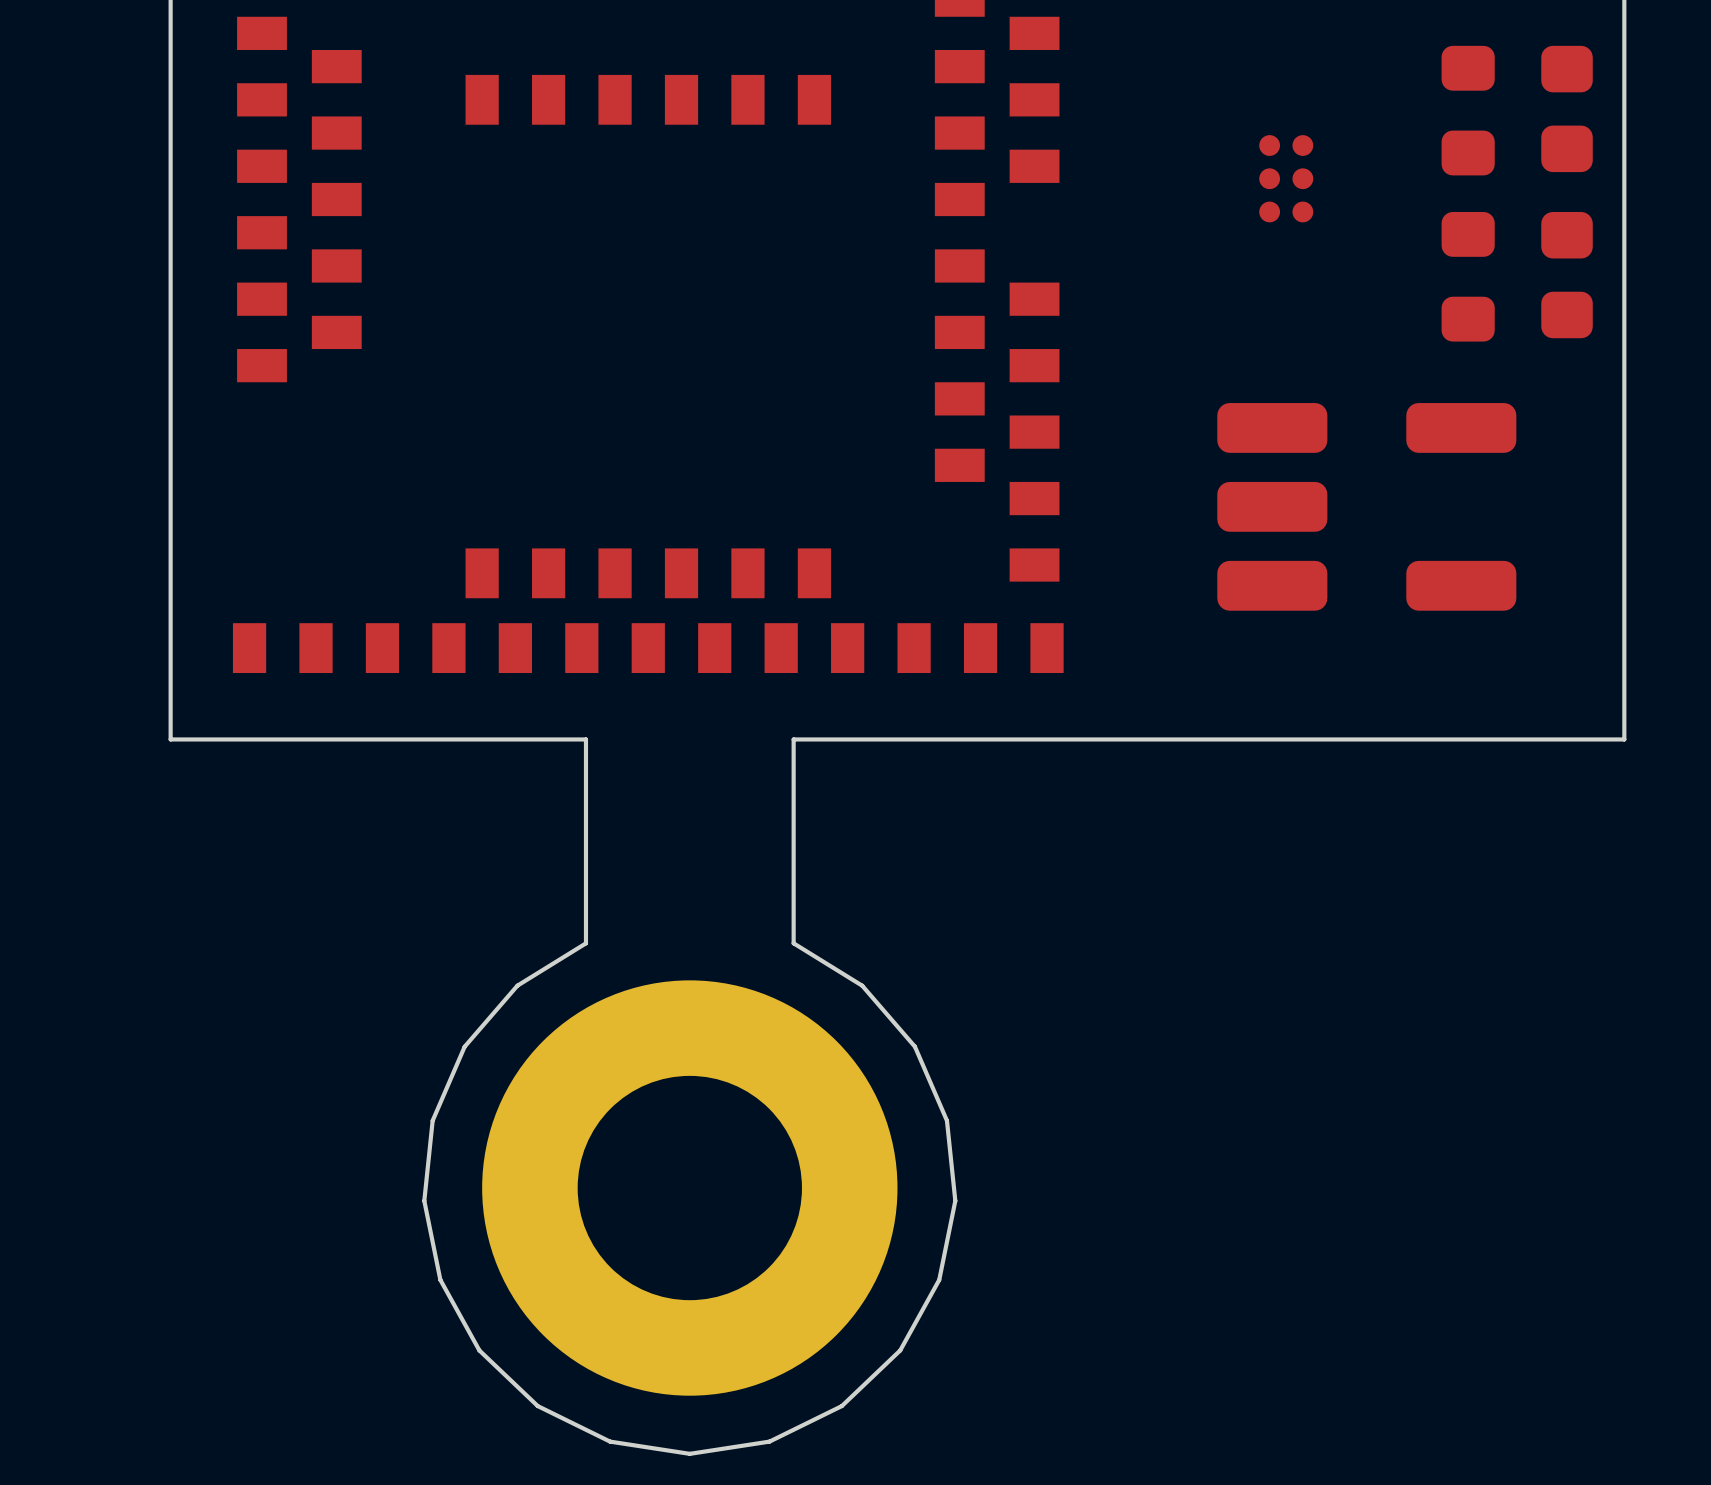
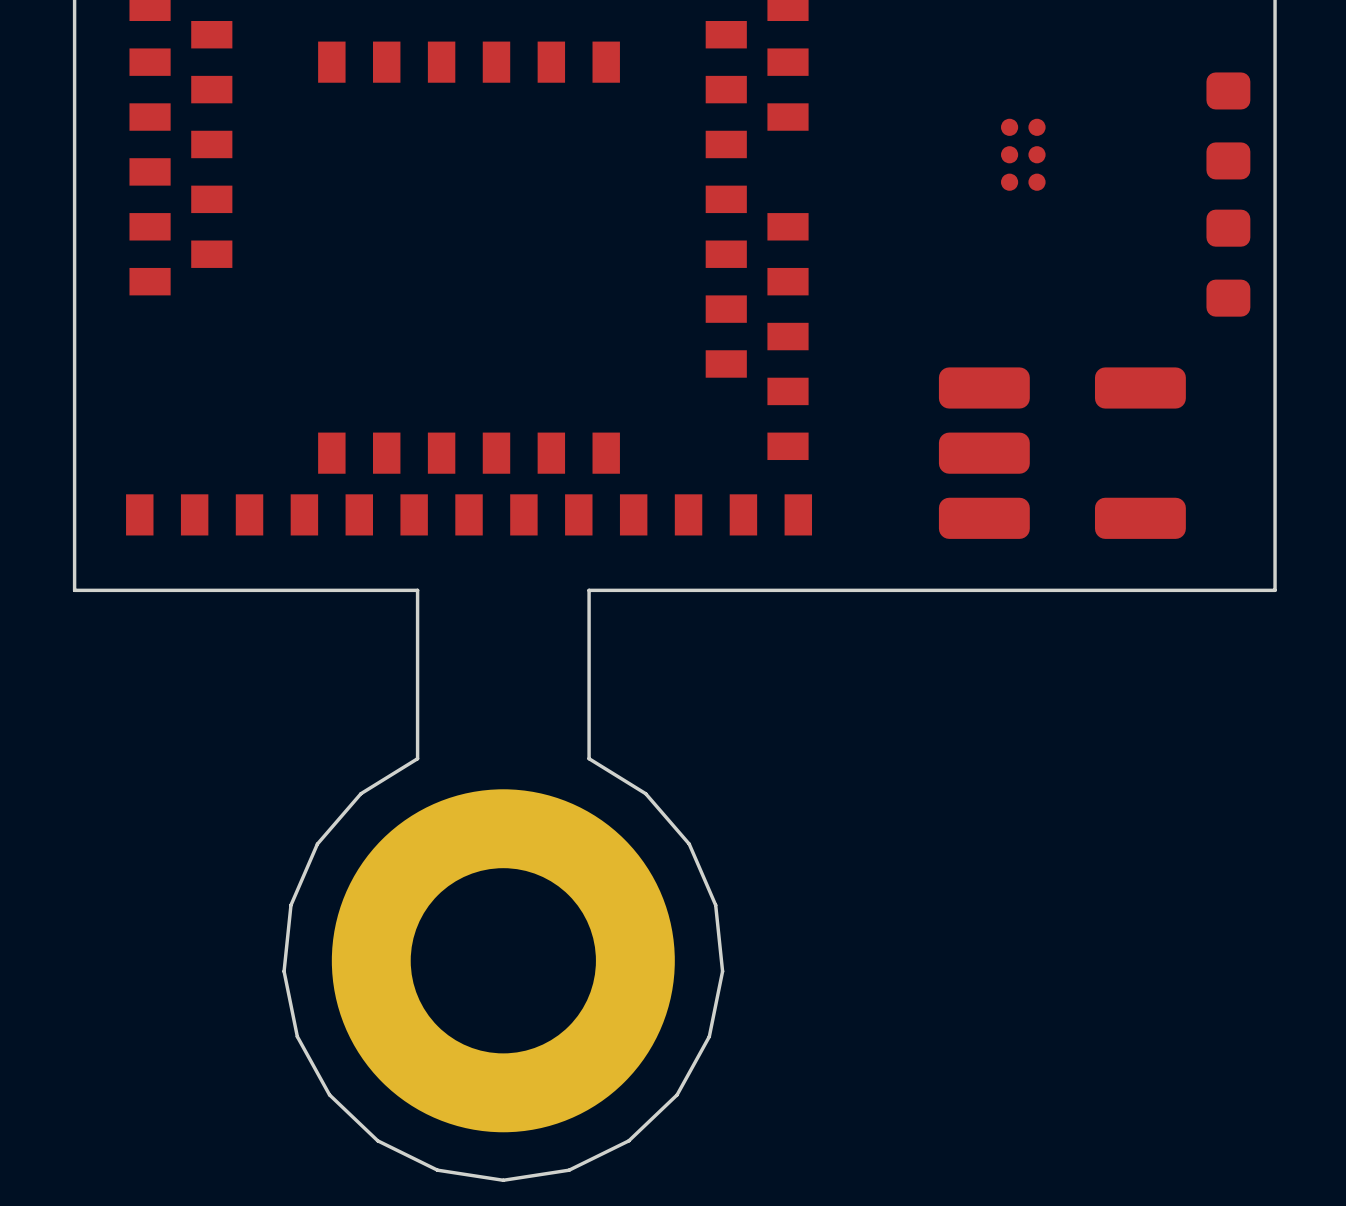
part: (1567, 108) -> none
part: (1468, 110) -> none
part: none -> (1228, 125)
part position: (1286, 178) -> (1023, 154)
part: (1567, 275) -> none
part: (1468, 276) -> none
part: none -> (1228, 263)
part position: (1366, 506) -> (1062, 453)

